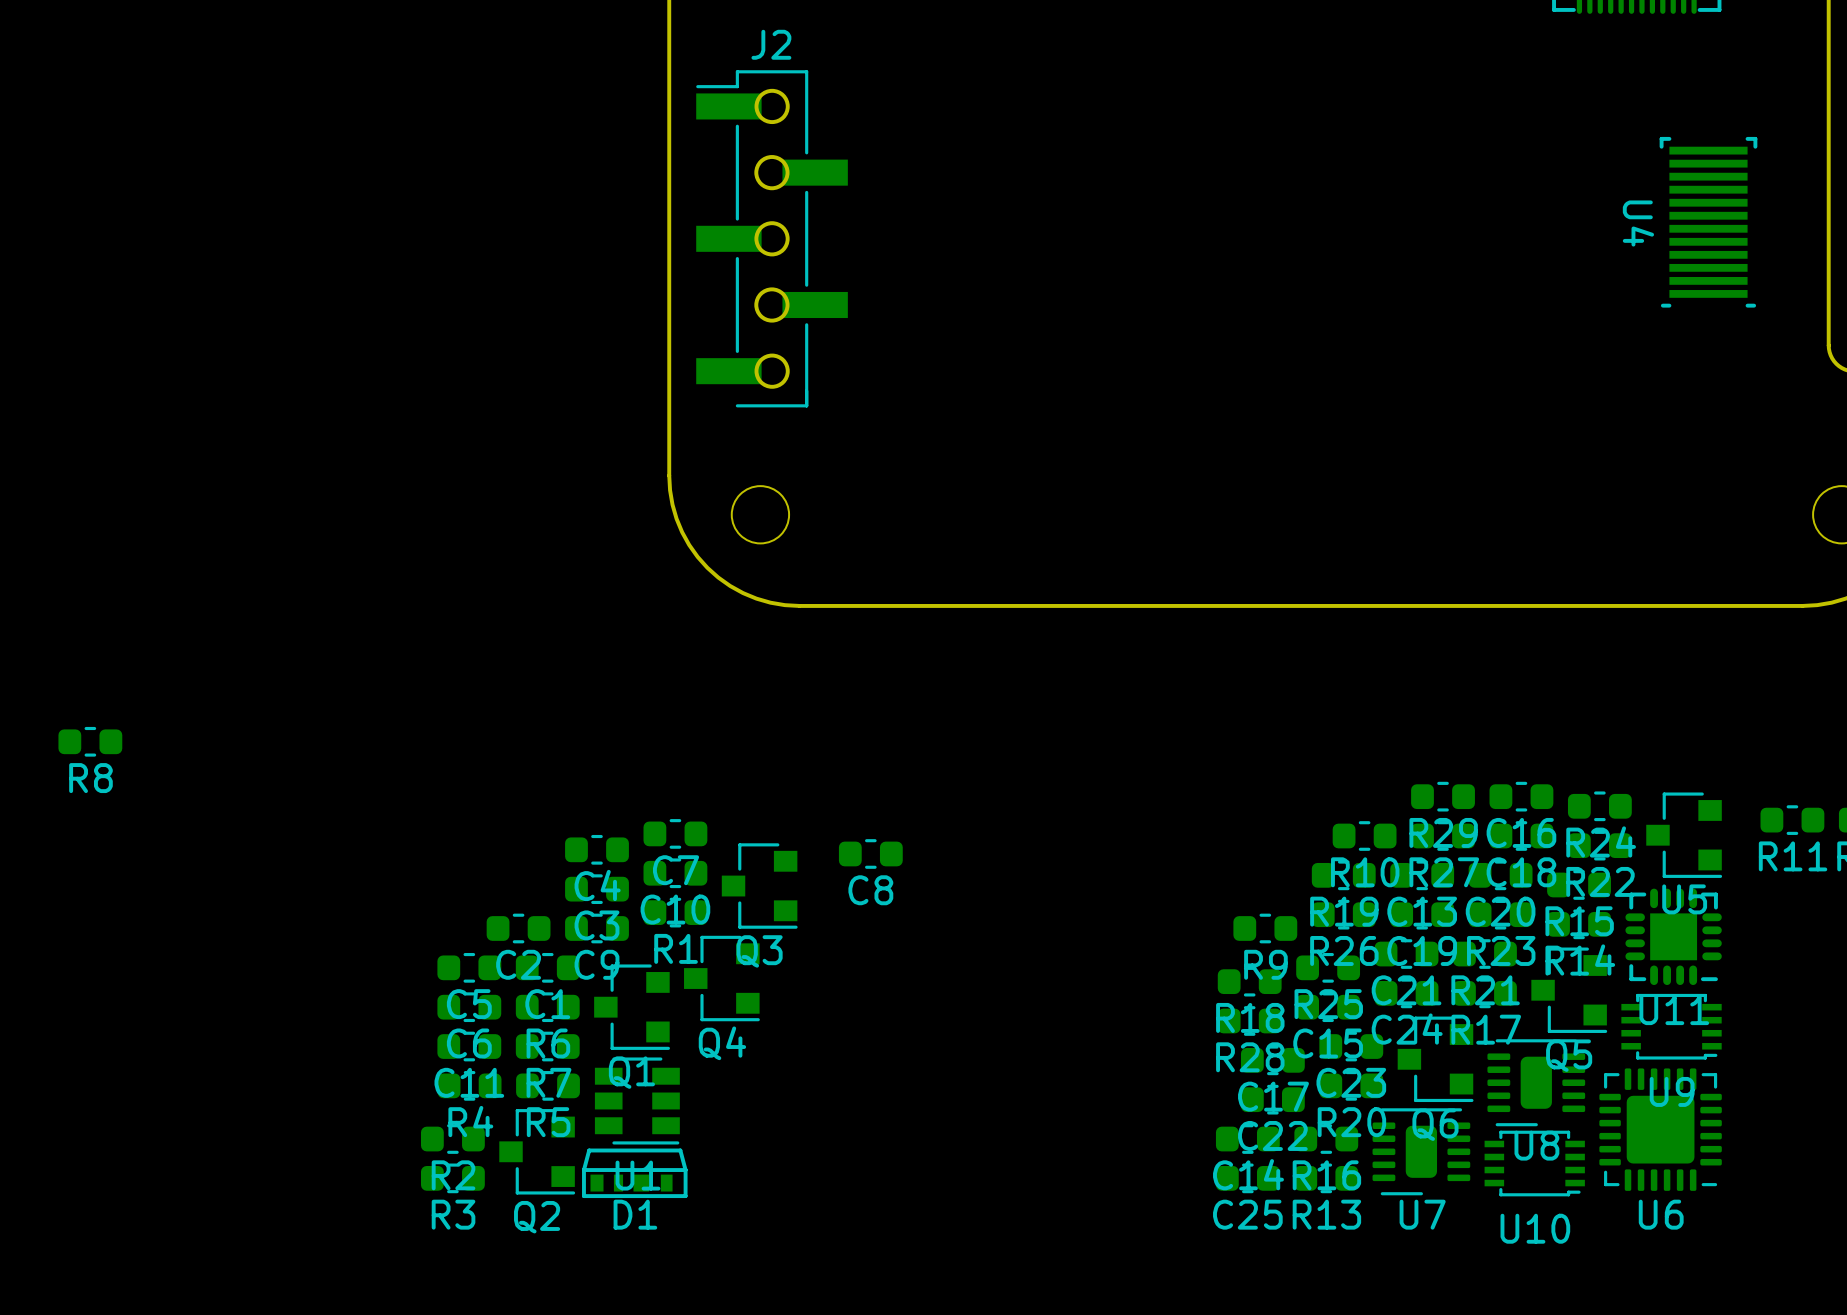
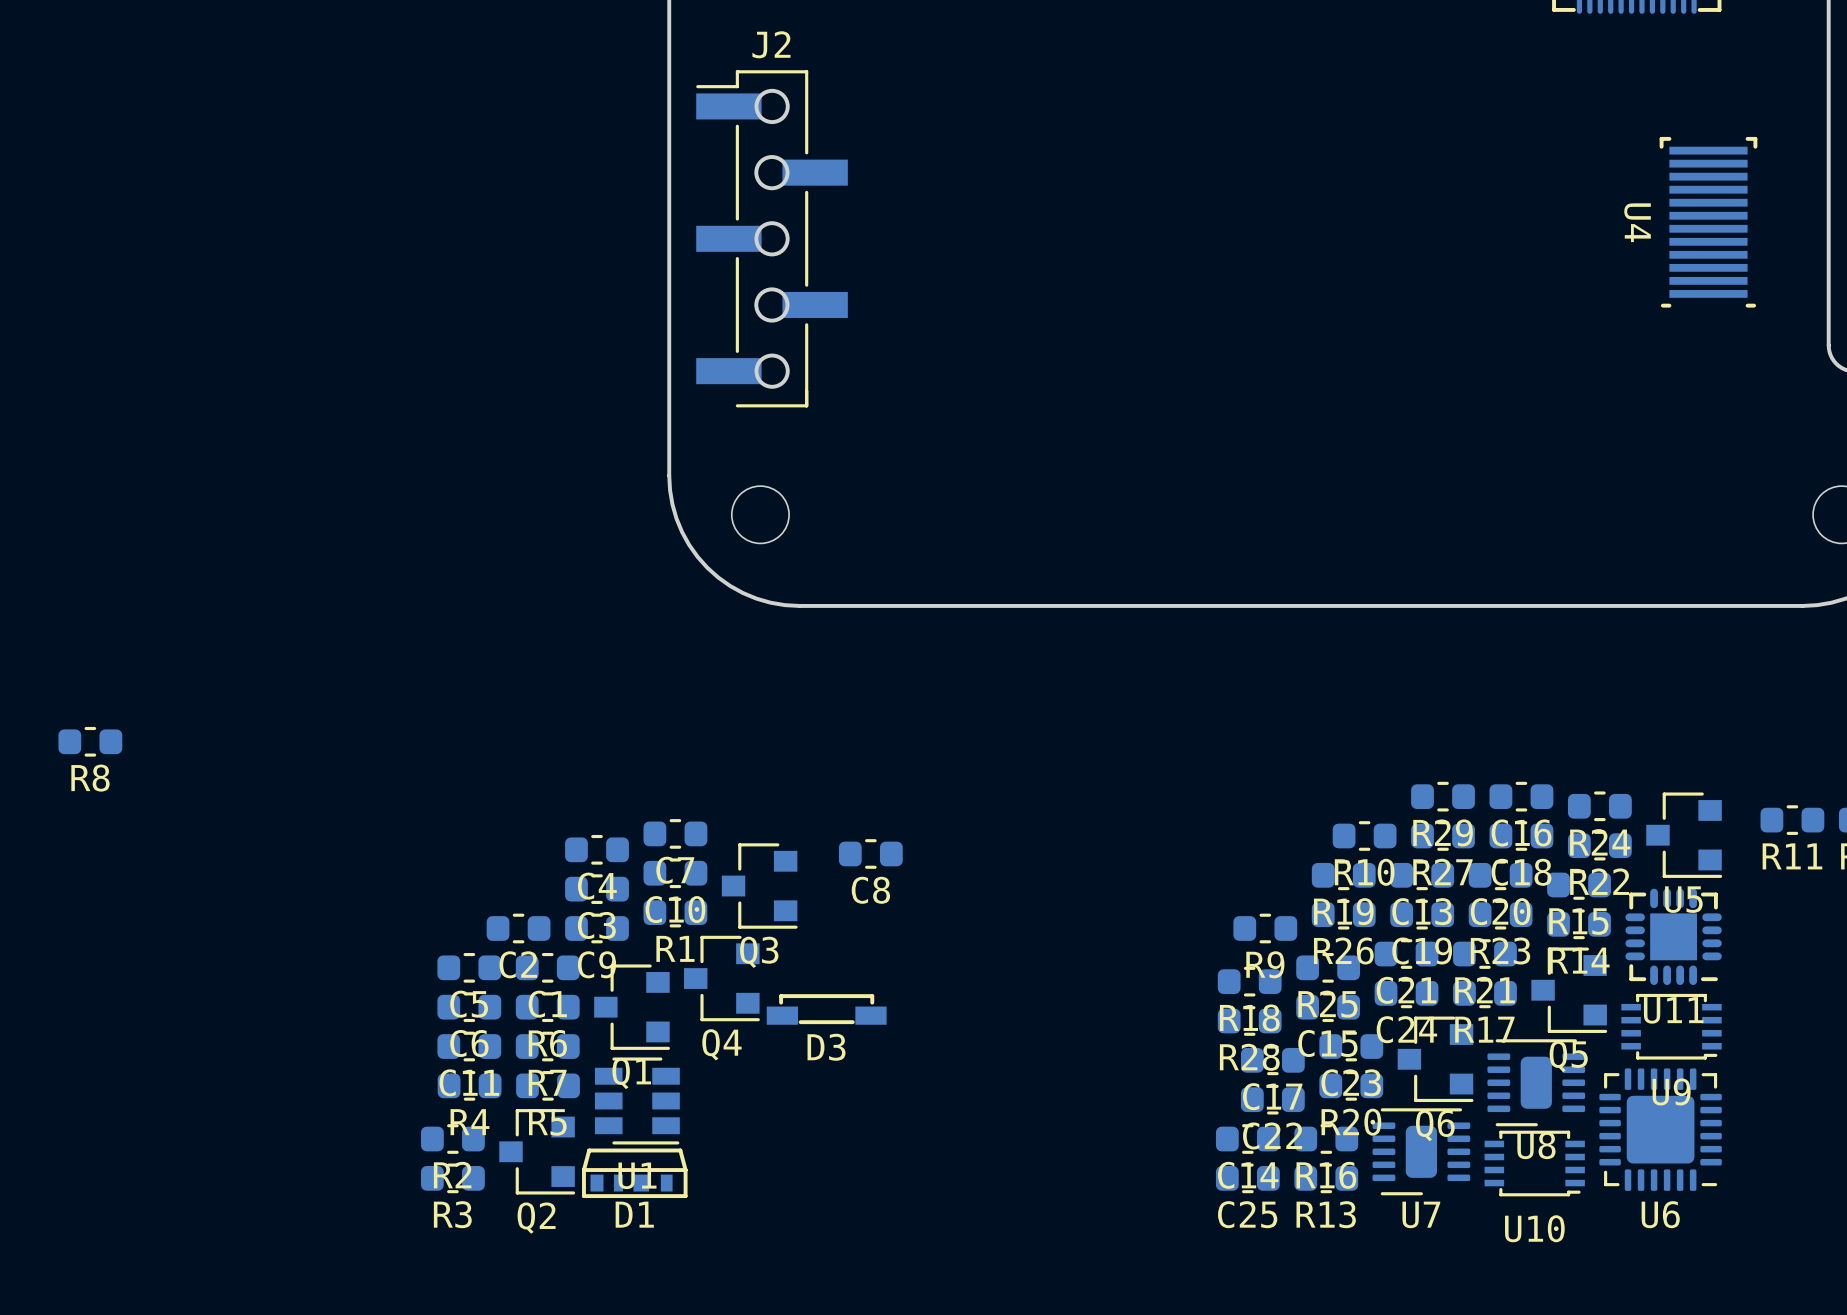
D3: none -> (826, 1009)

